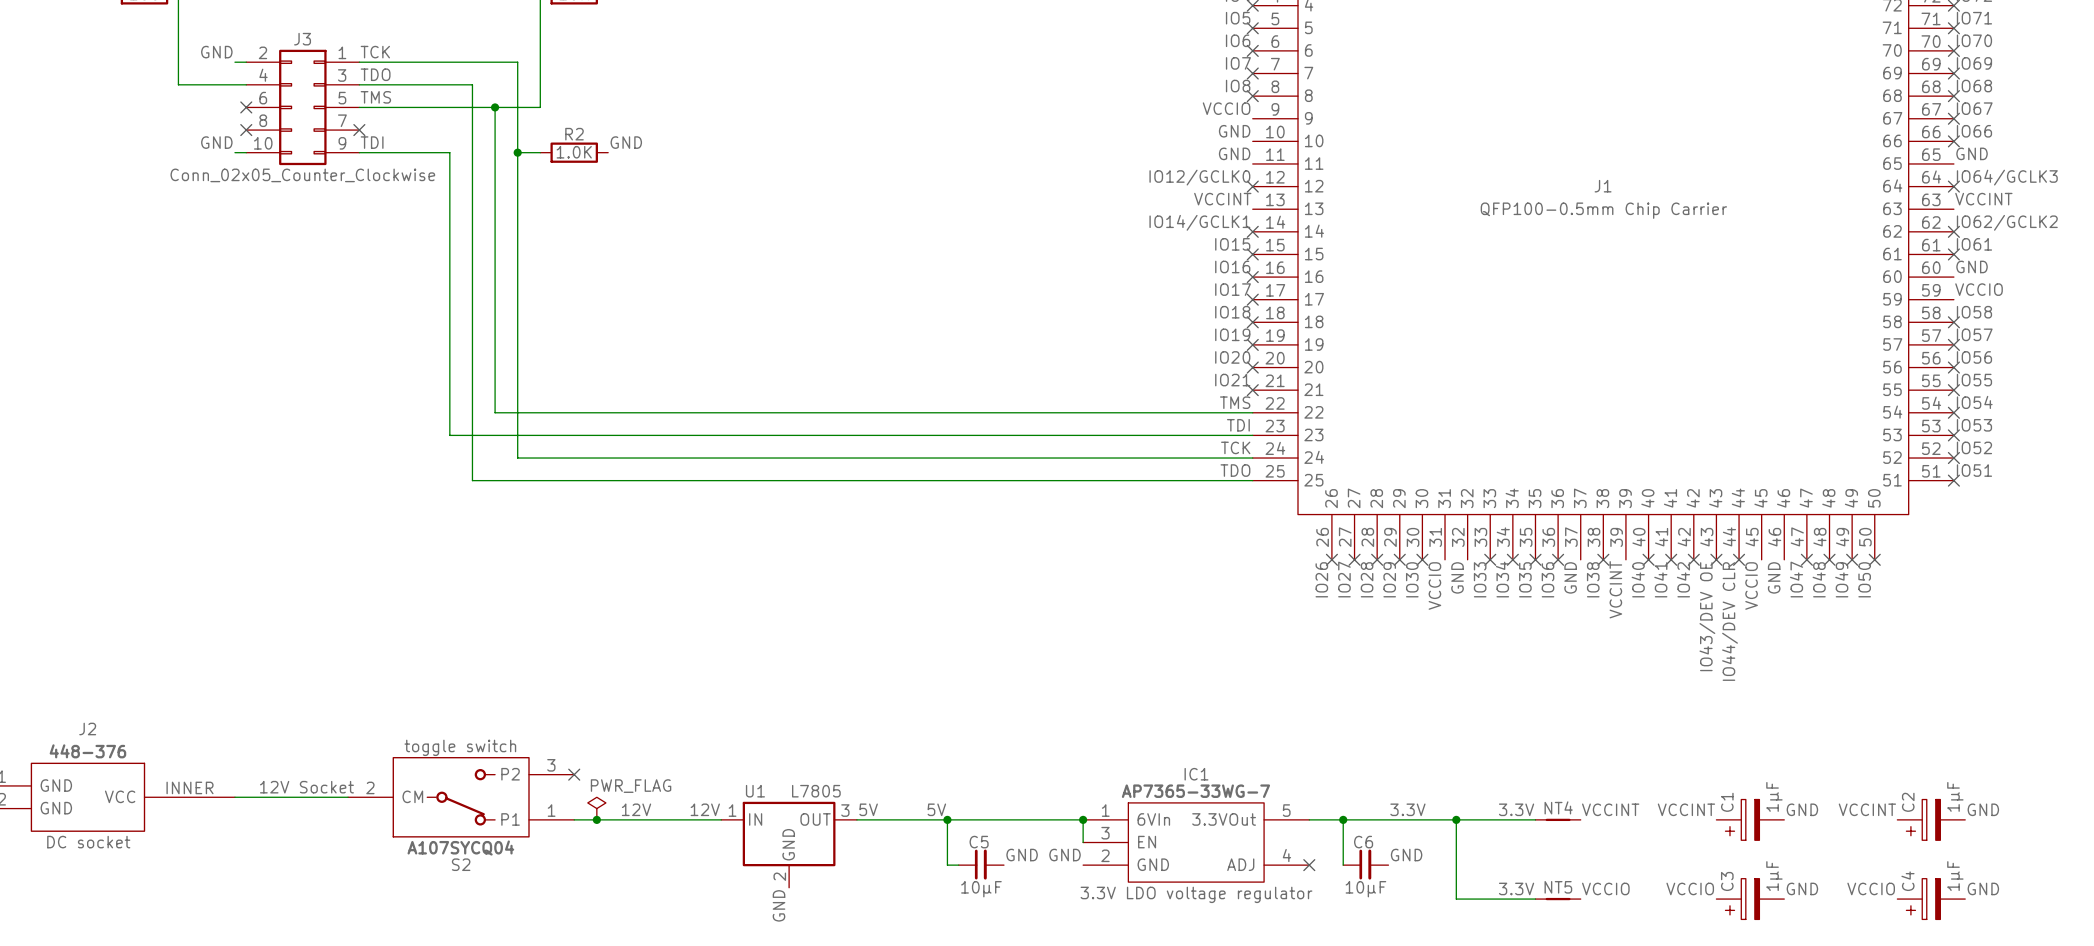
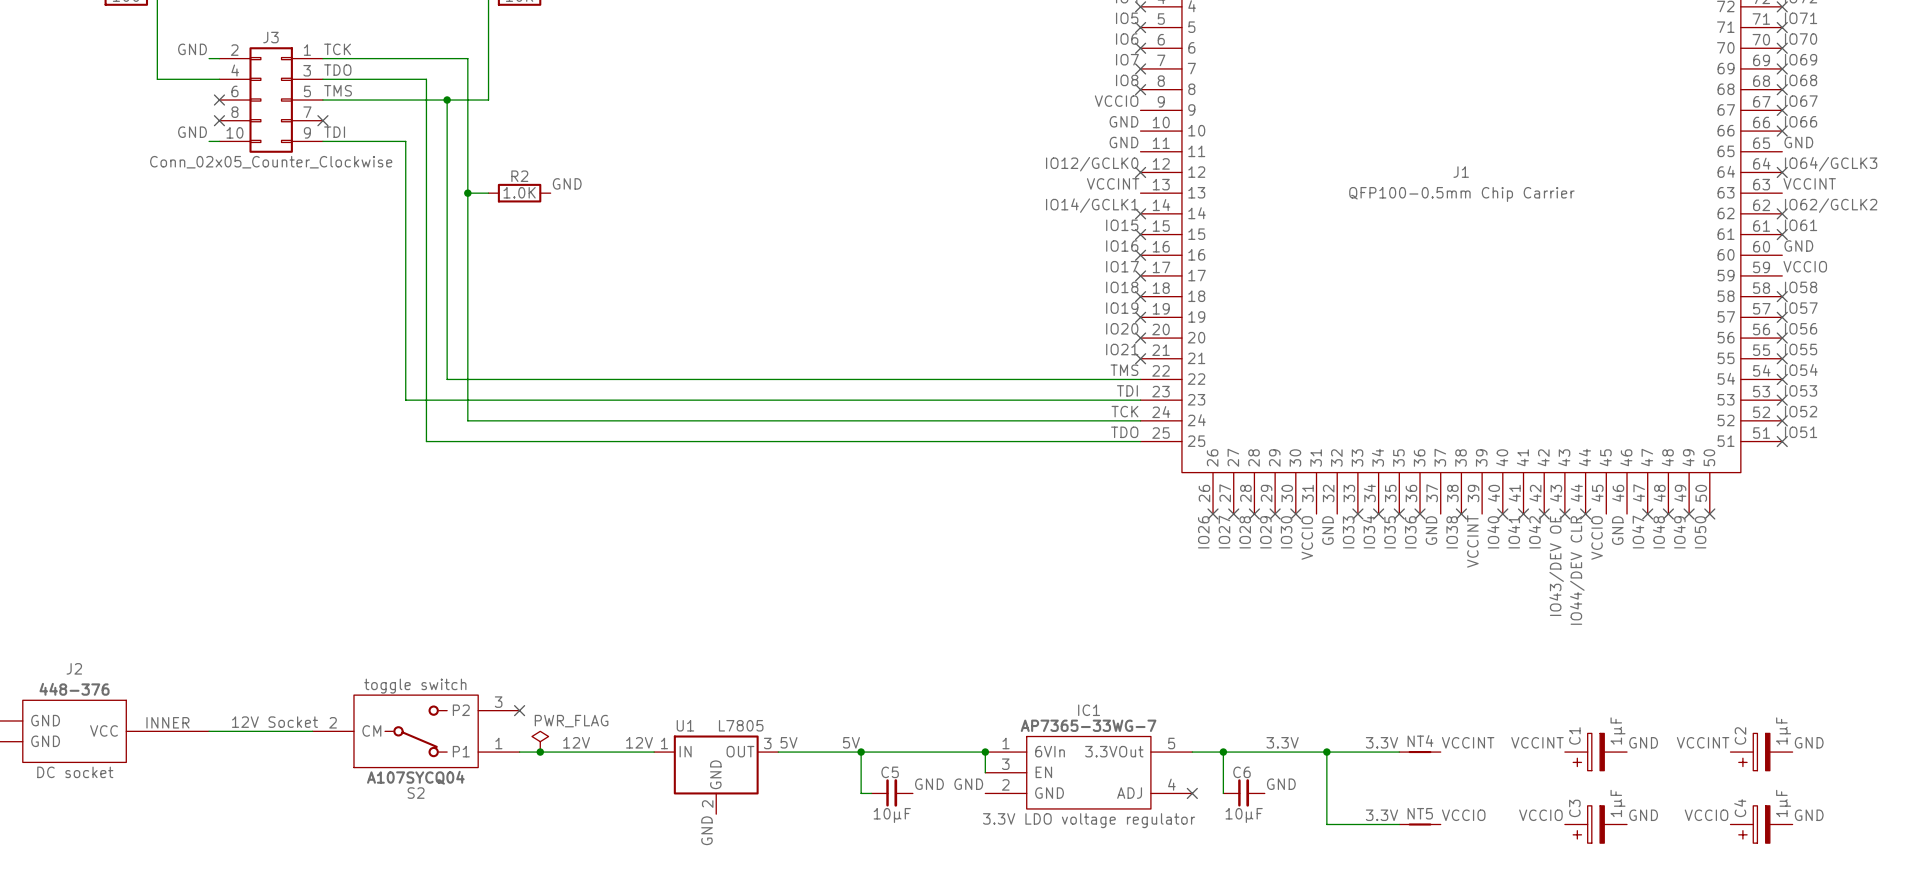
label position: GND (626, 142) -> GND (567, 183)
wire: (517, 152) (540, 152) -> (467, 193) (488, 193)
junction: (517, 152) -> none
R2 position: (574, 152) -> (519, 193)
junction: none -> (467, 193)

